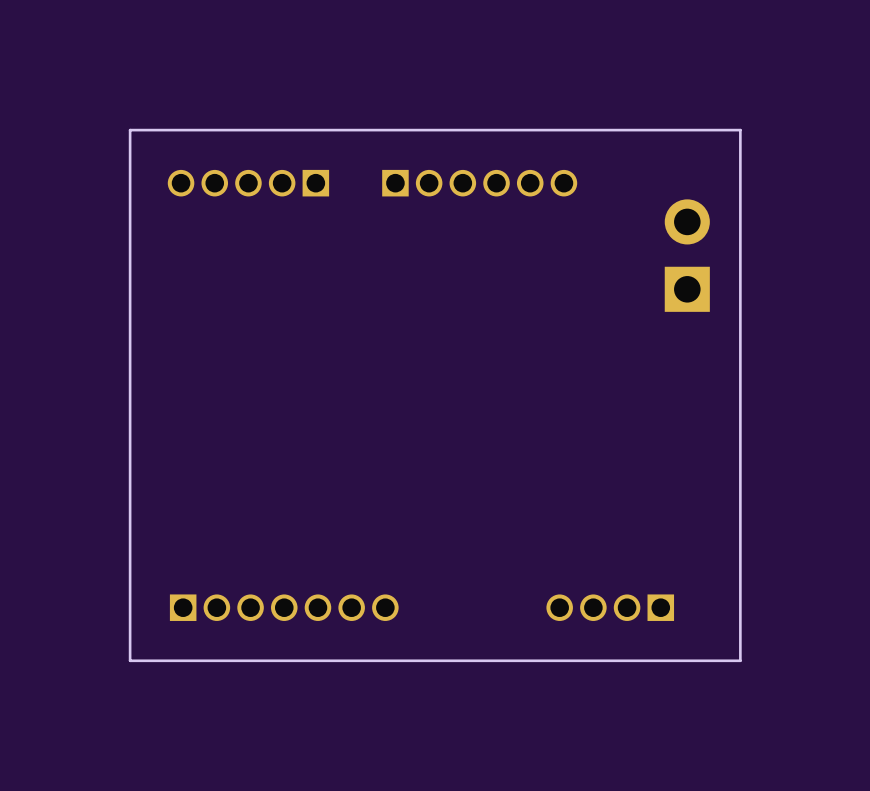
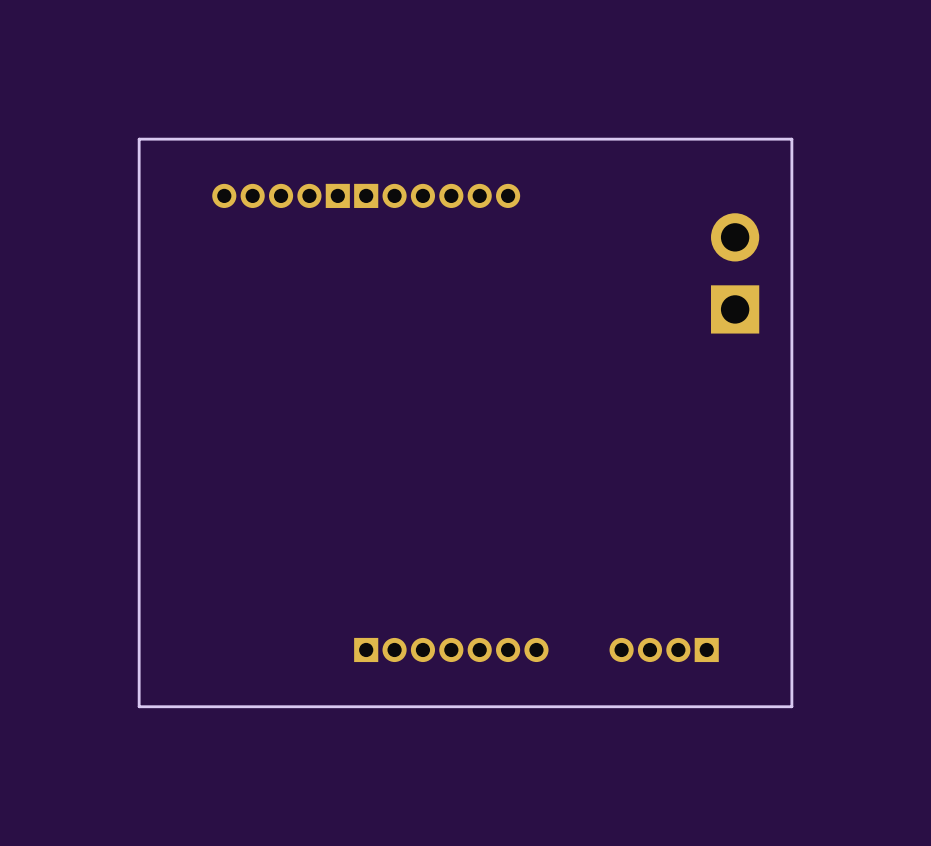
part footprint: [167, 169, 330, 197] -> [212, 183, 350, 208]
part: none -> (437, 195)
part: (479, 183) -> none
part footprint: [546, 594, 675, 621] -> [609, 637, 719, 663]
part: (284, 607) -> none
part: none -> (451, 649)

